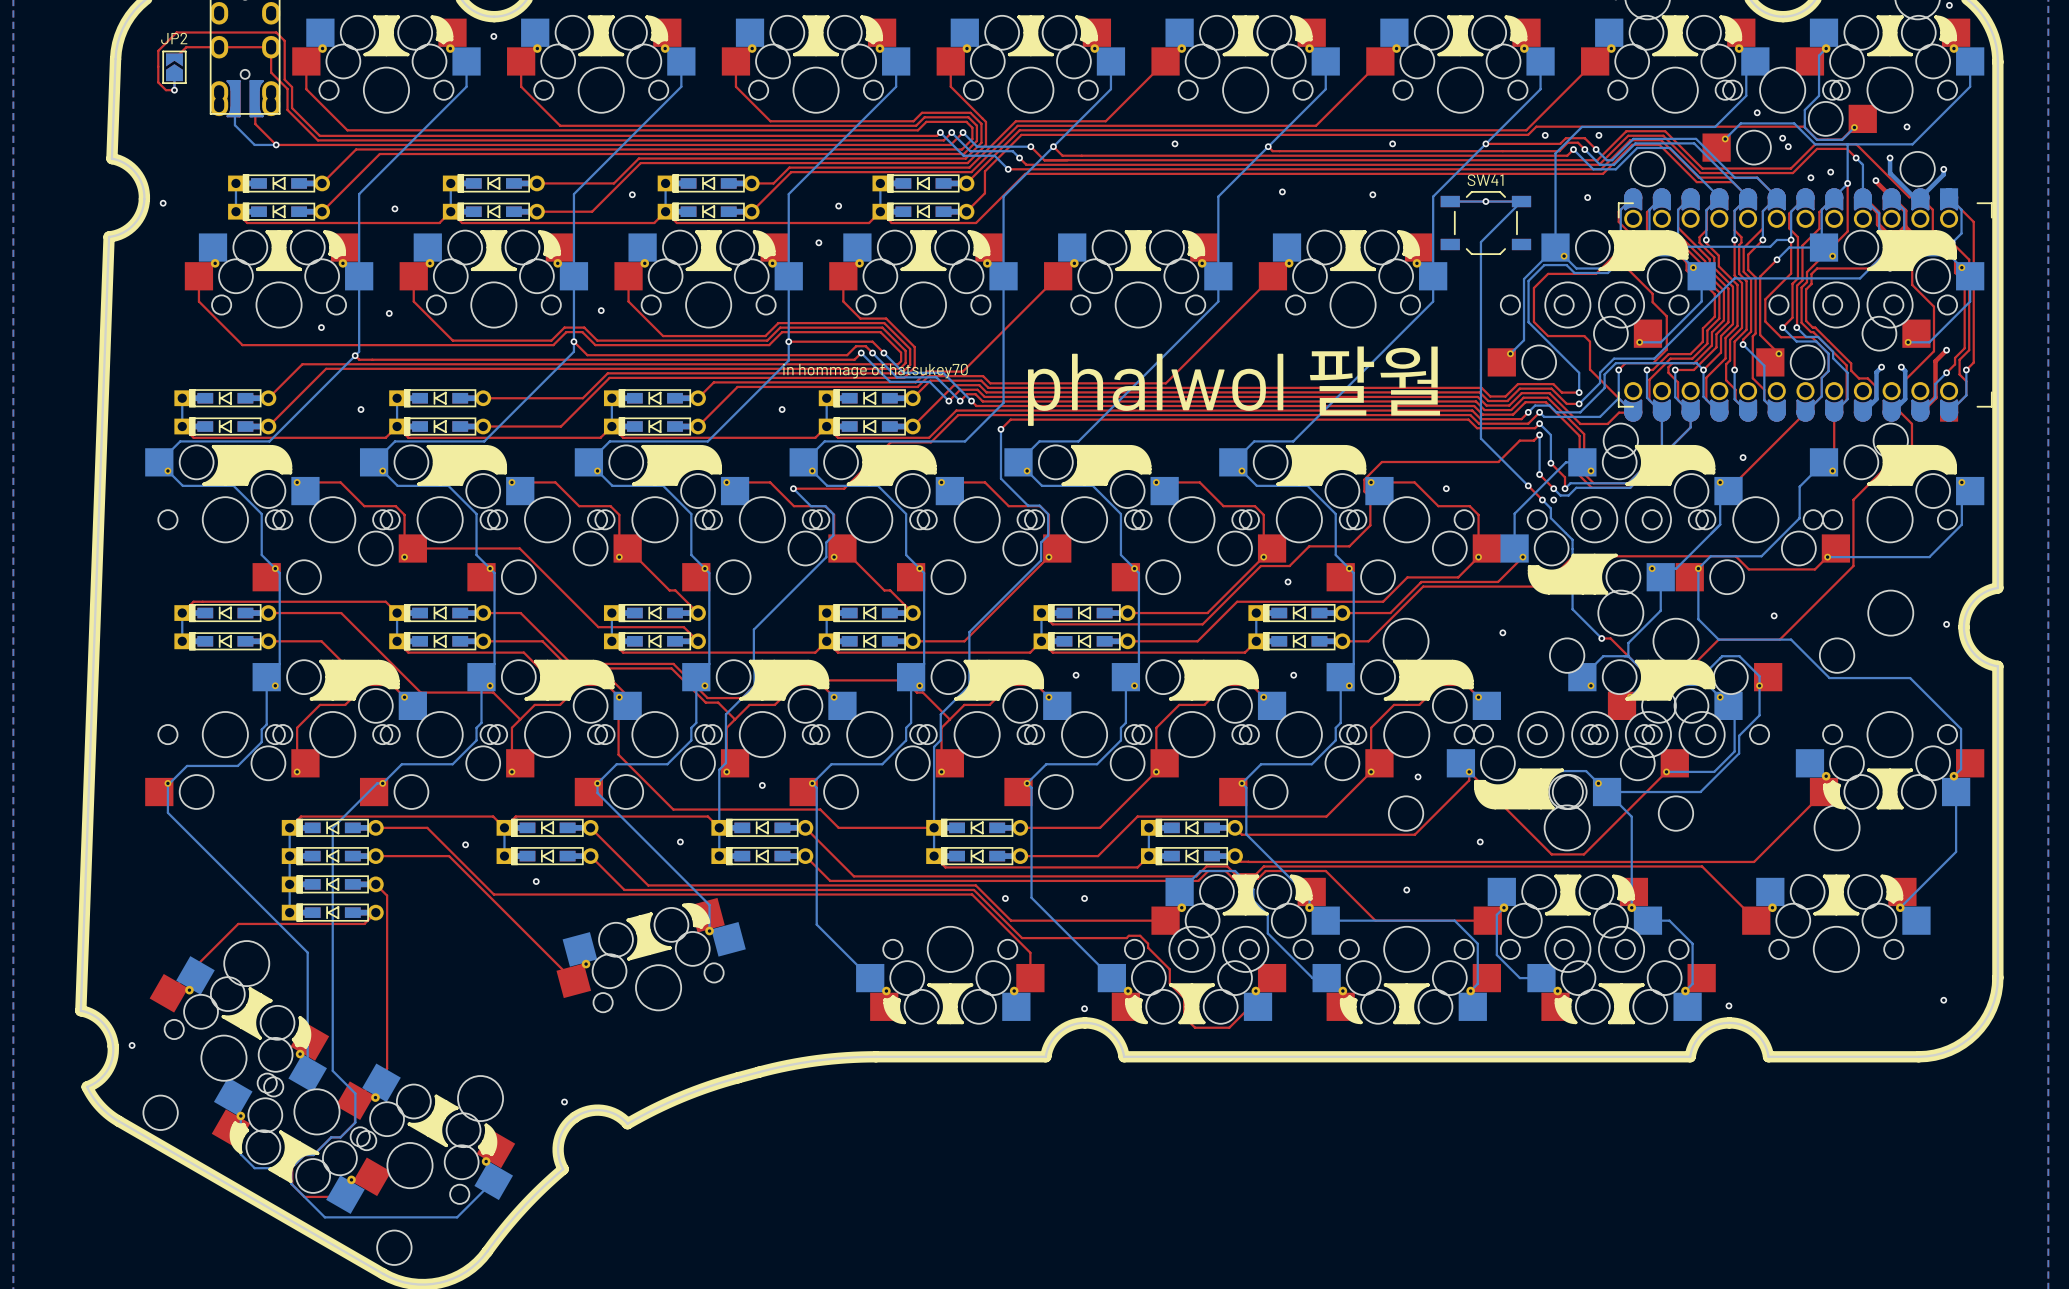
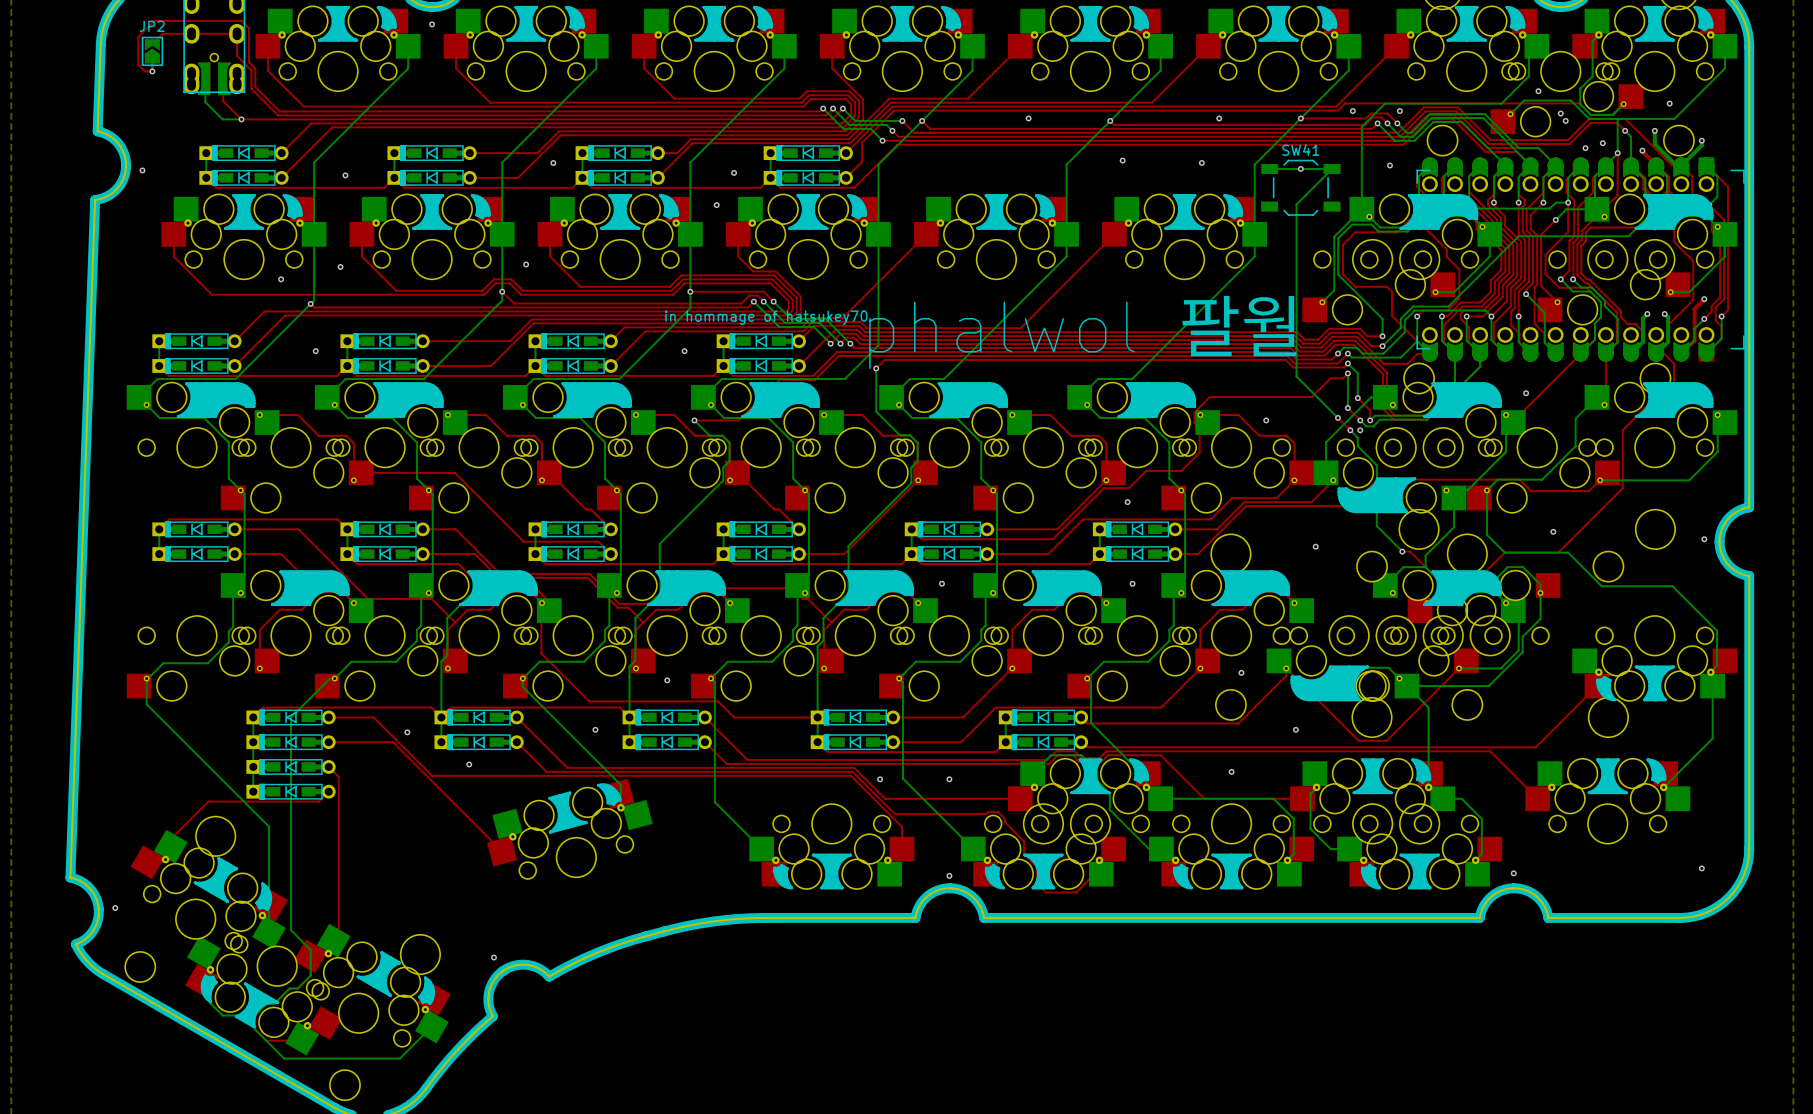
bottom track: none -> (472, 593) (447, 618) (447, 655) (441, 661) (441, 717)

